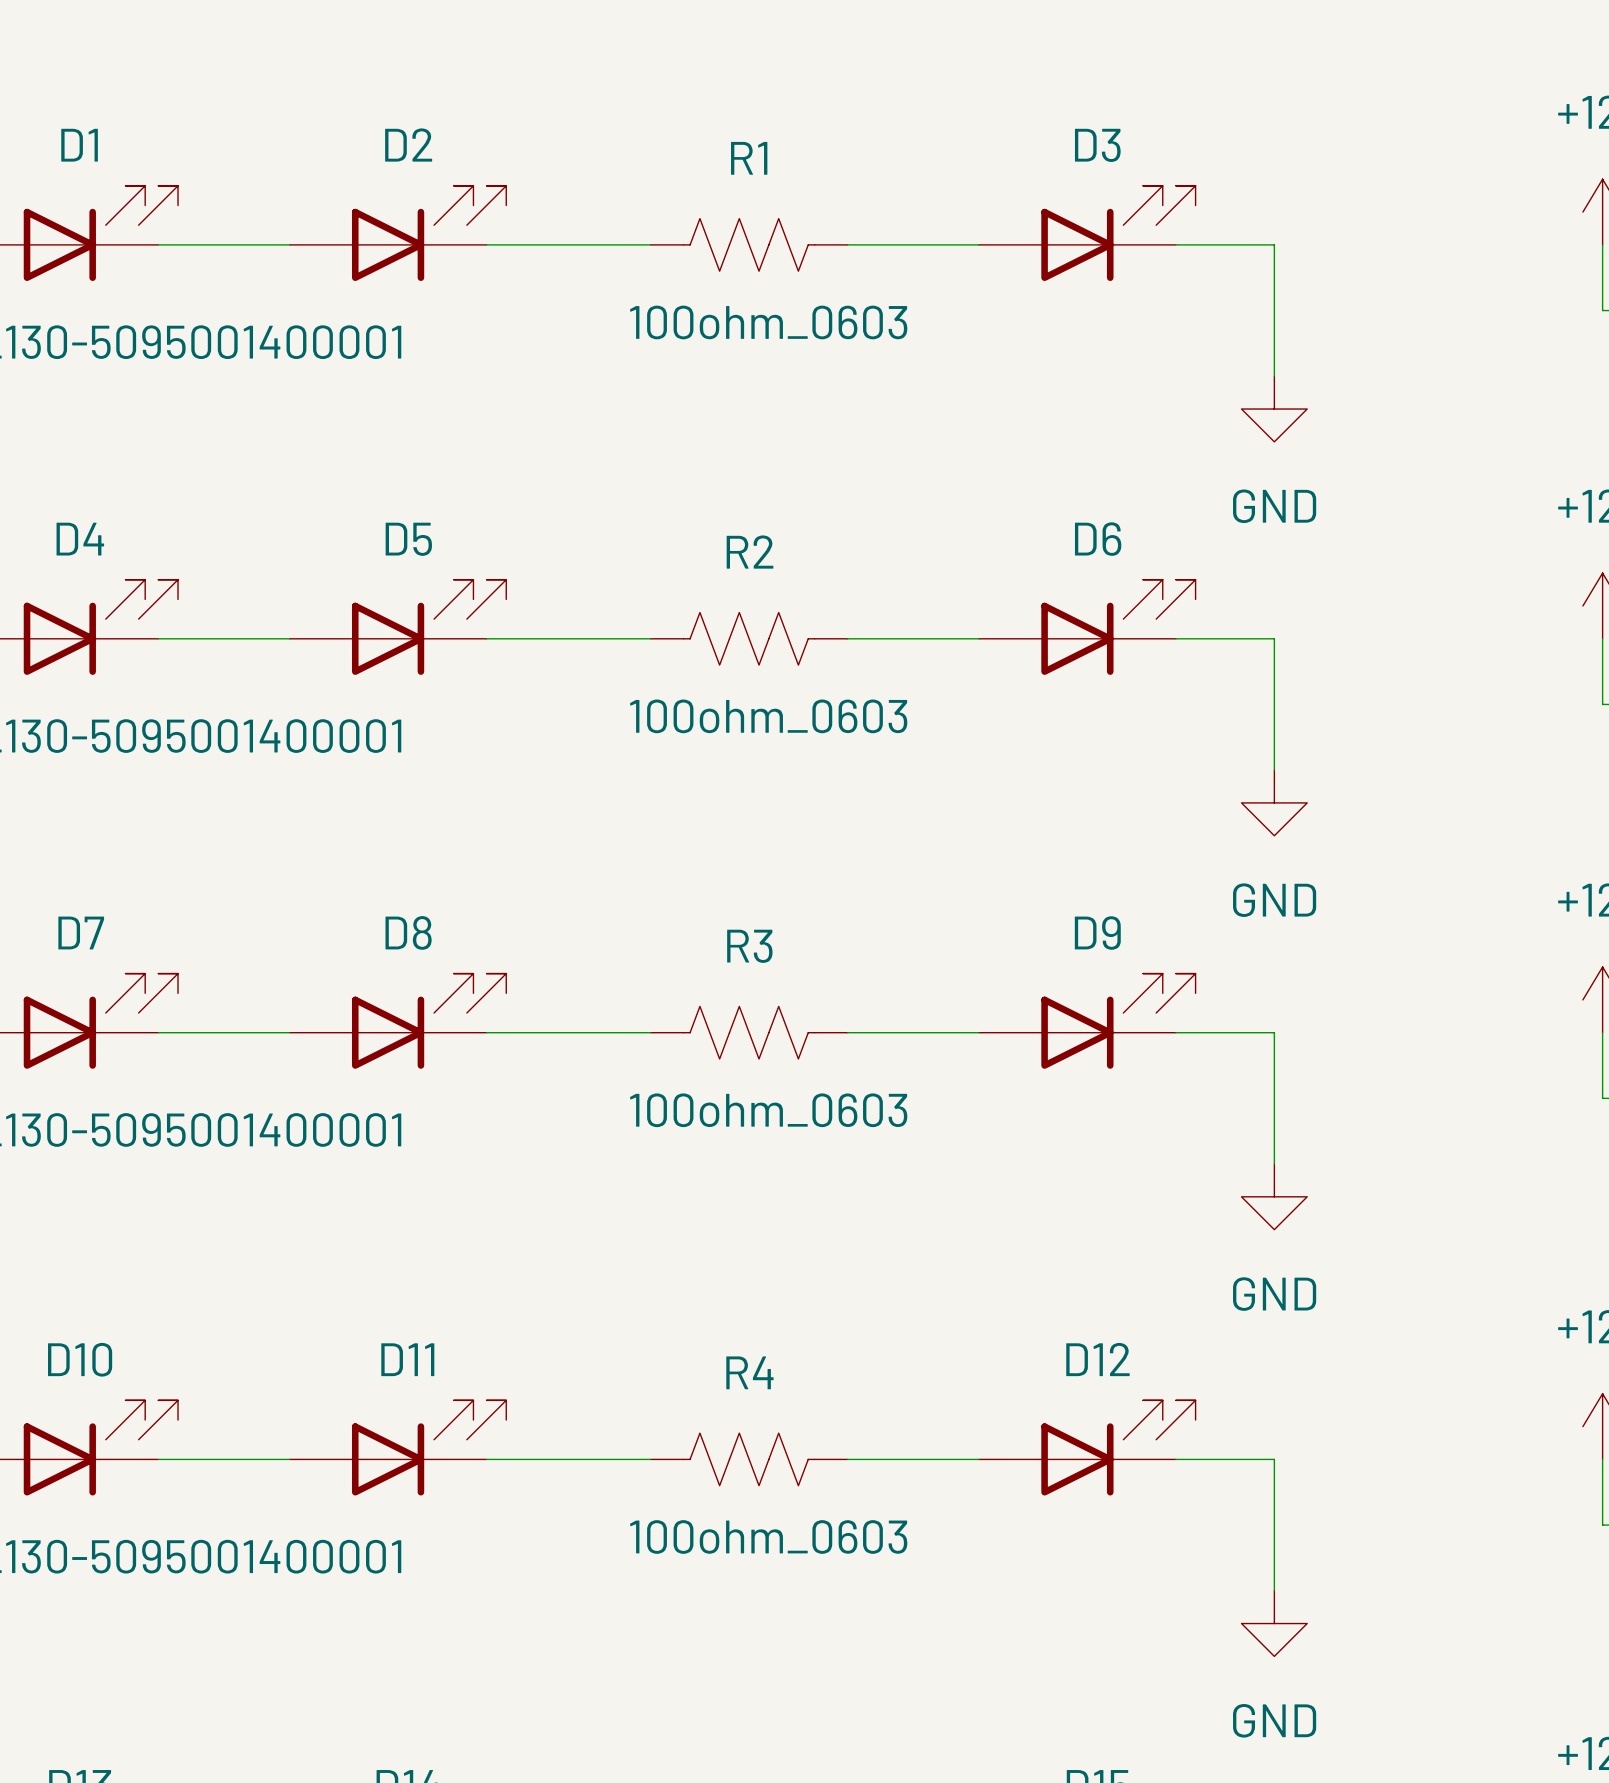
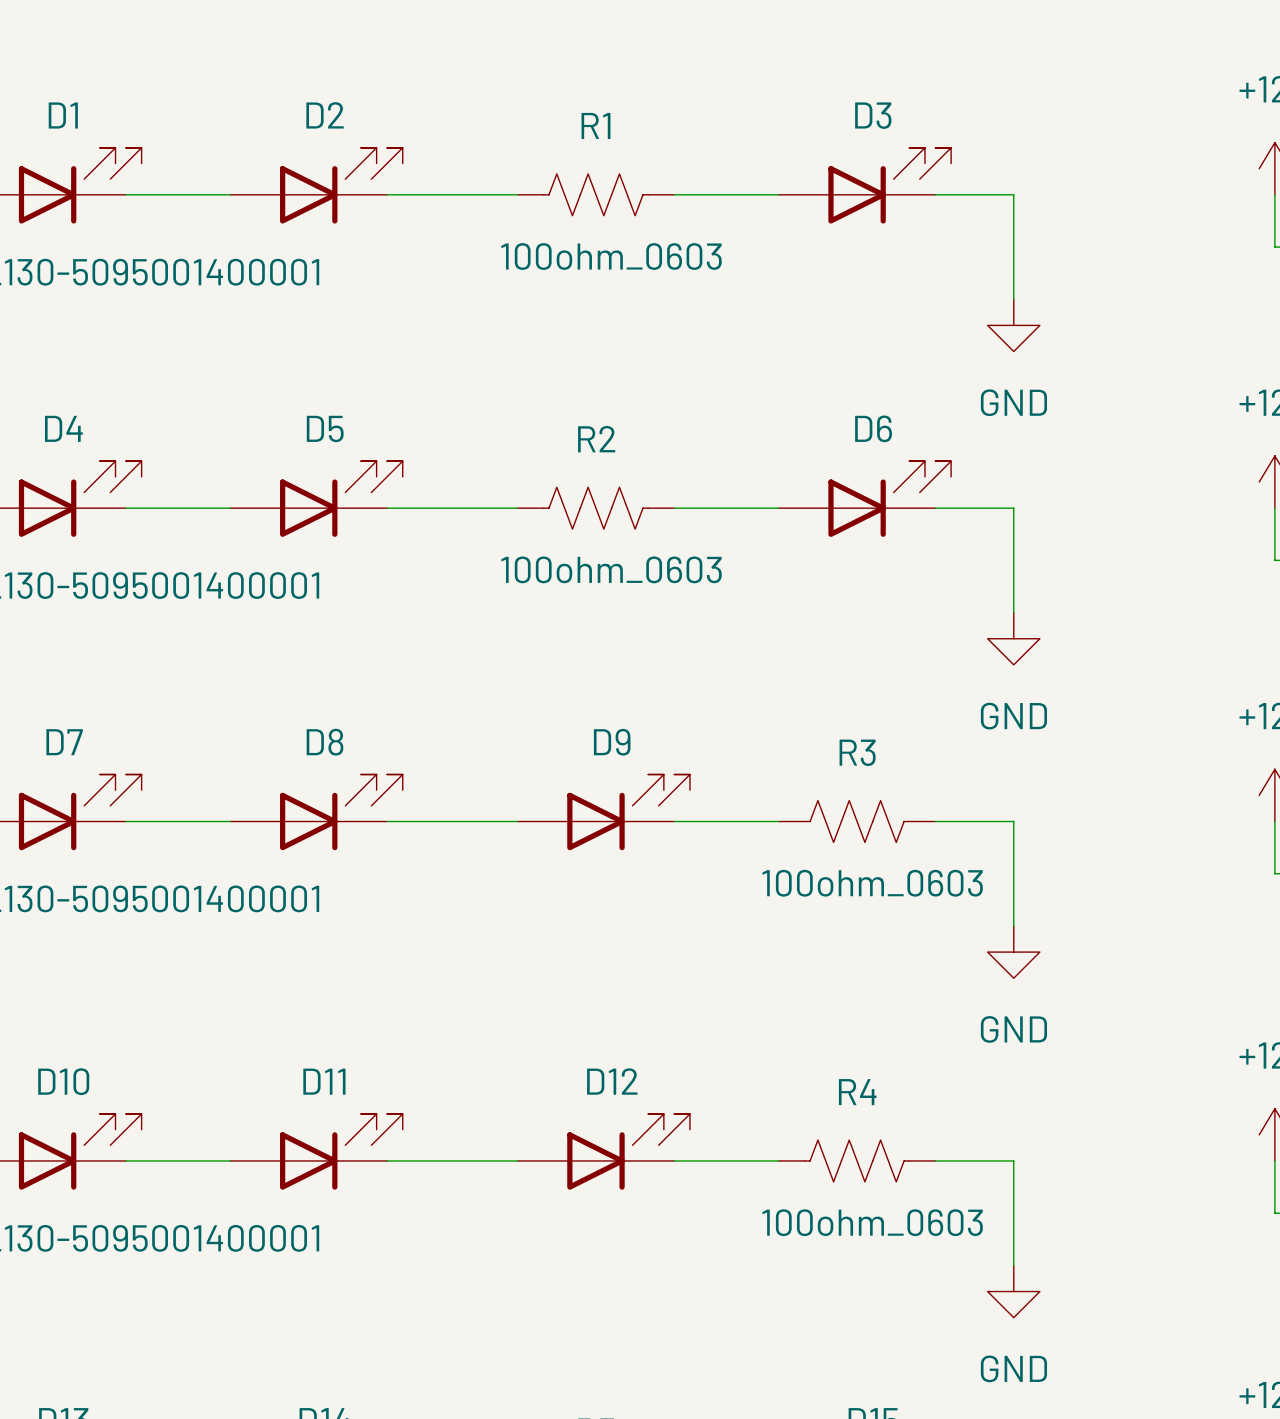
D9 position: (1087, 1021) -> (603, 812)
R3 position: (749, 1032) -> (857, 821)
D12 position: (1087, 1447) -> (603, 1151)
R4 position: (749, 1459) -> (857, 1160)

